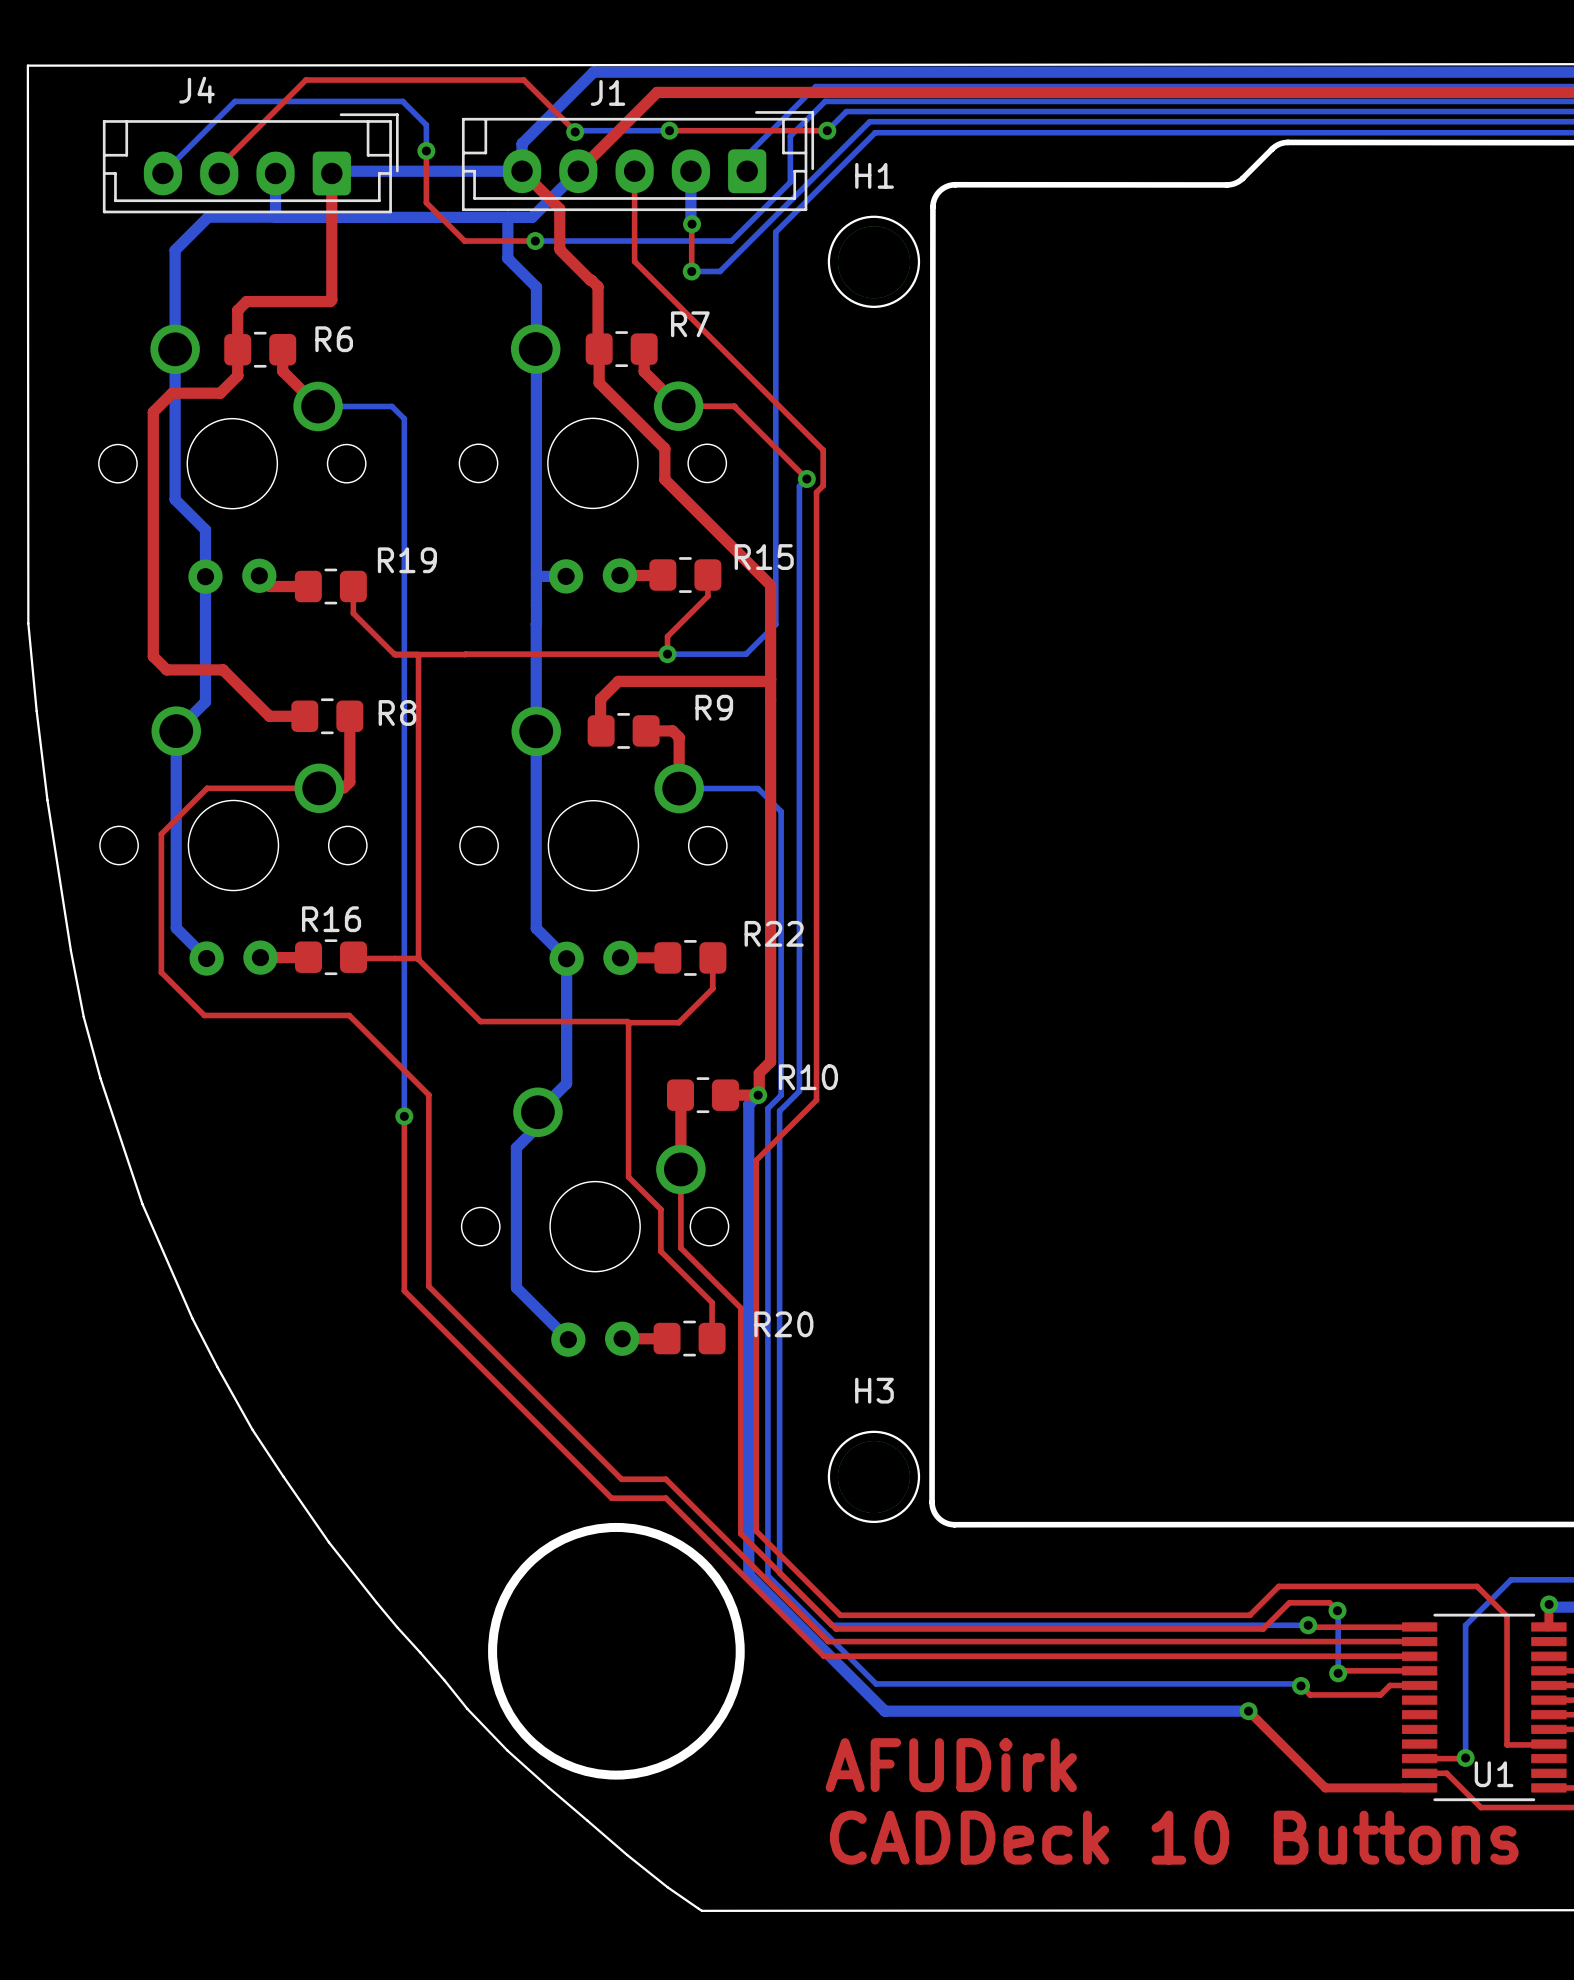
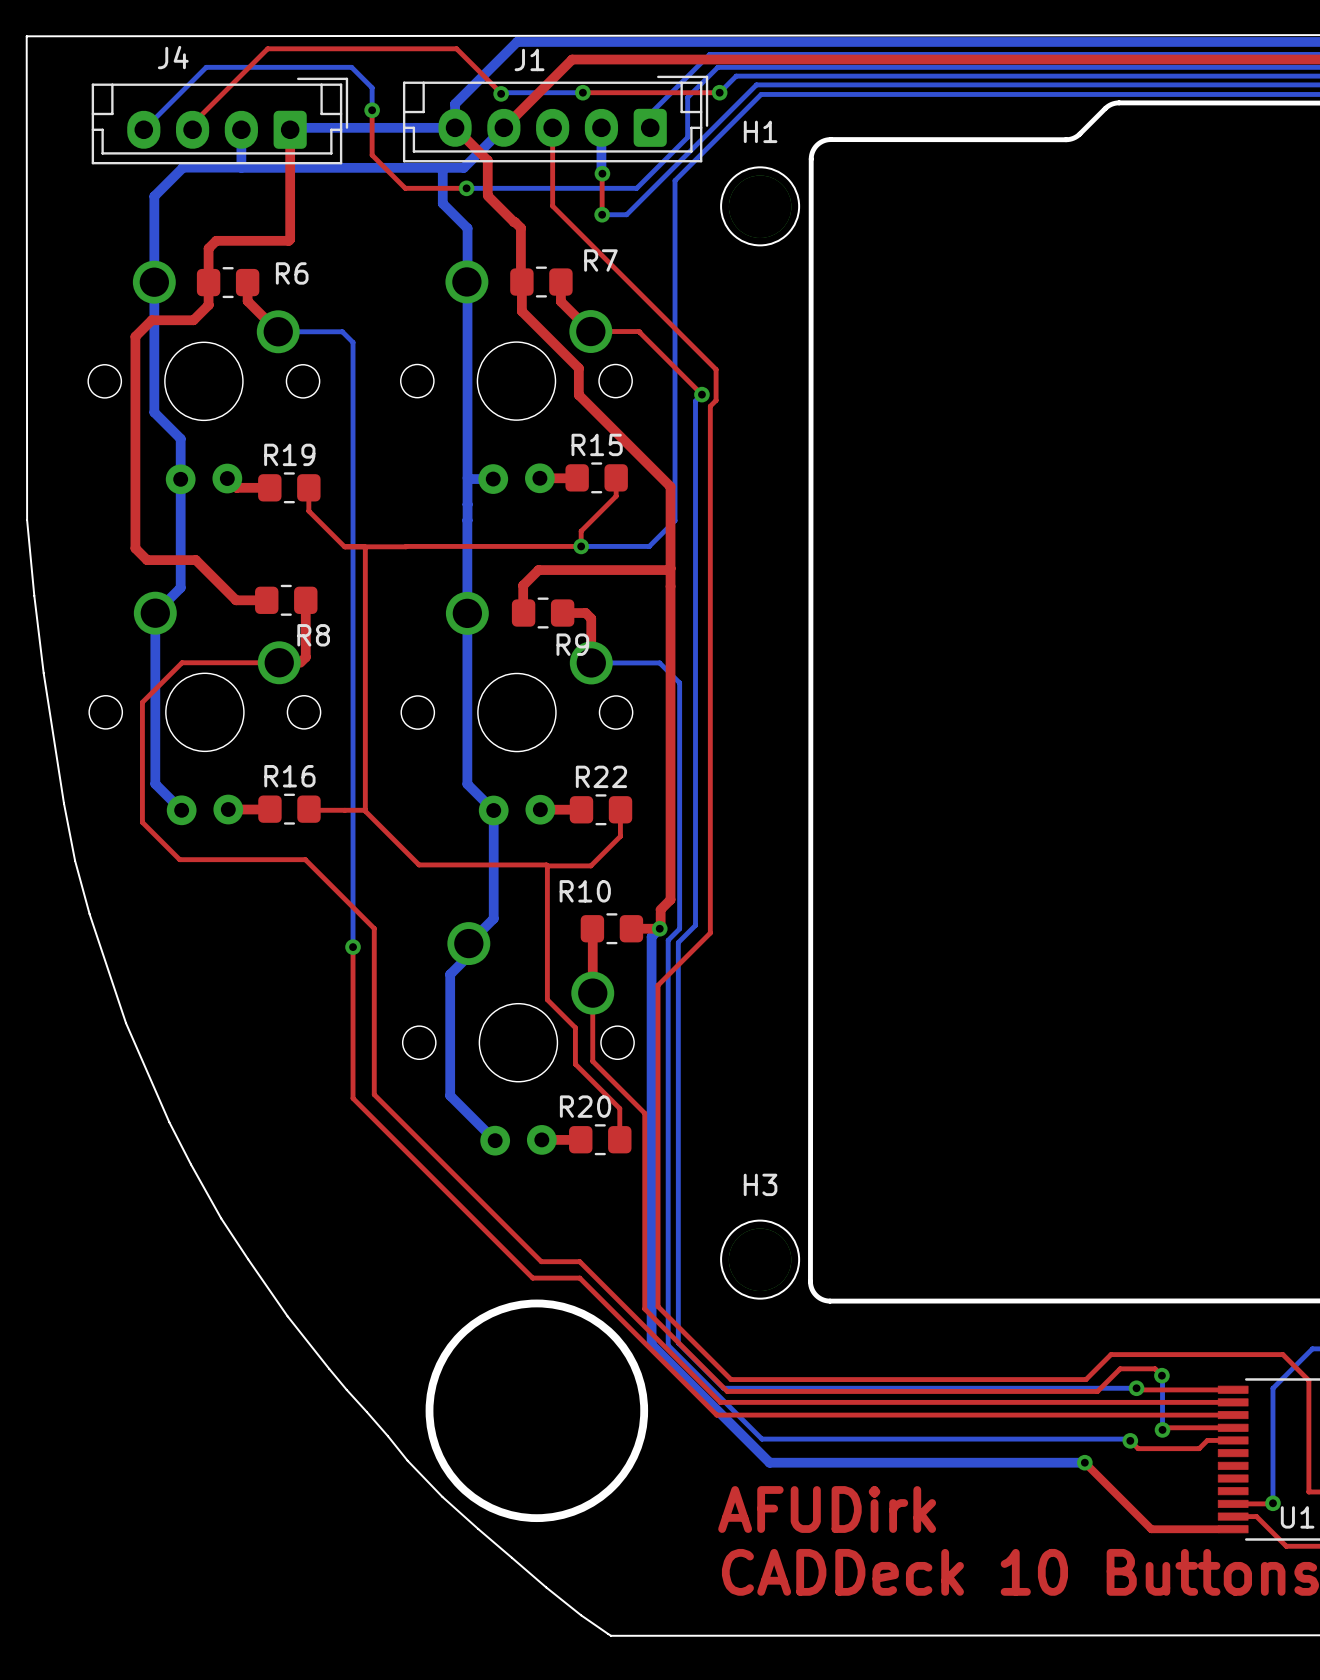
R15 name position: R15 (764, 557) -> R15 (597, 444)
R19 name position: R19 (407, 560) -> R19 (289, 454)
R9 name position: R9 (714, 707) -> R9 (572, 644)
R8 name position: R8 (397, 712) -> R8 (313, 635)
R22 name position: R22 (774, 933) -> R22 (601, 776)
R10 name position: R10 (808, 1077) -> R10 (585, 891)
R20 name position: R20 (783, 1324) -> R20 (585, 1106)

